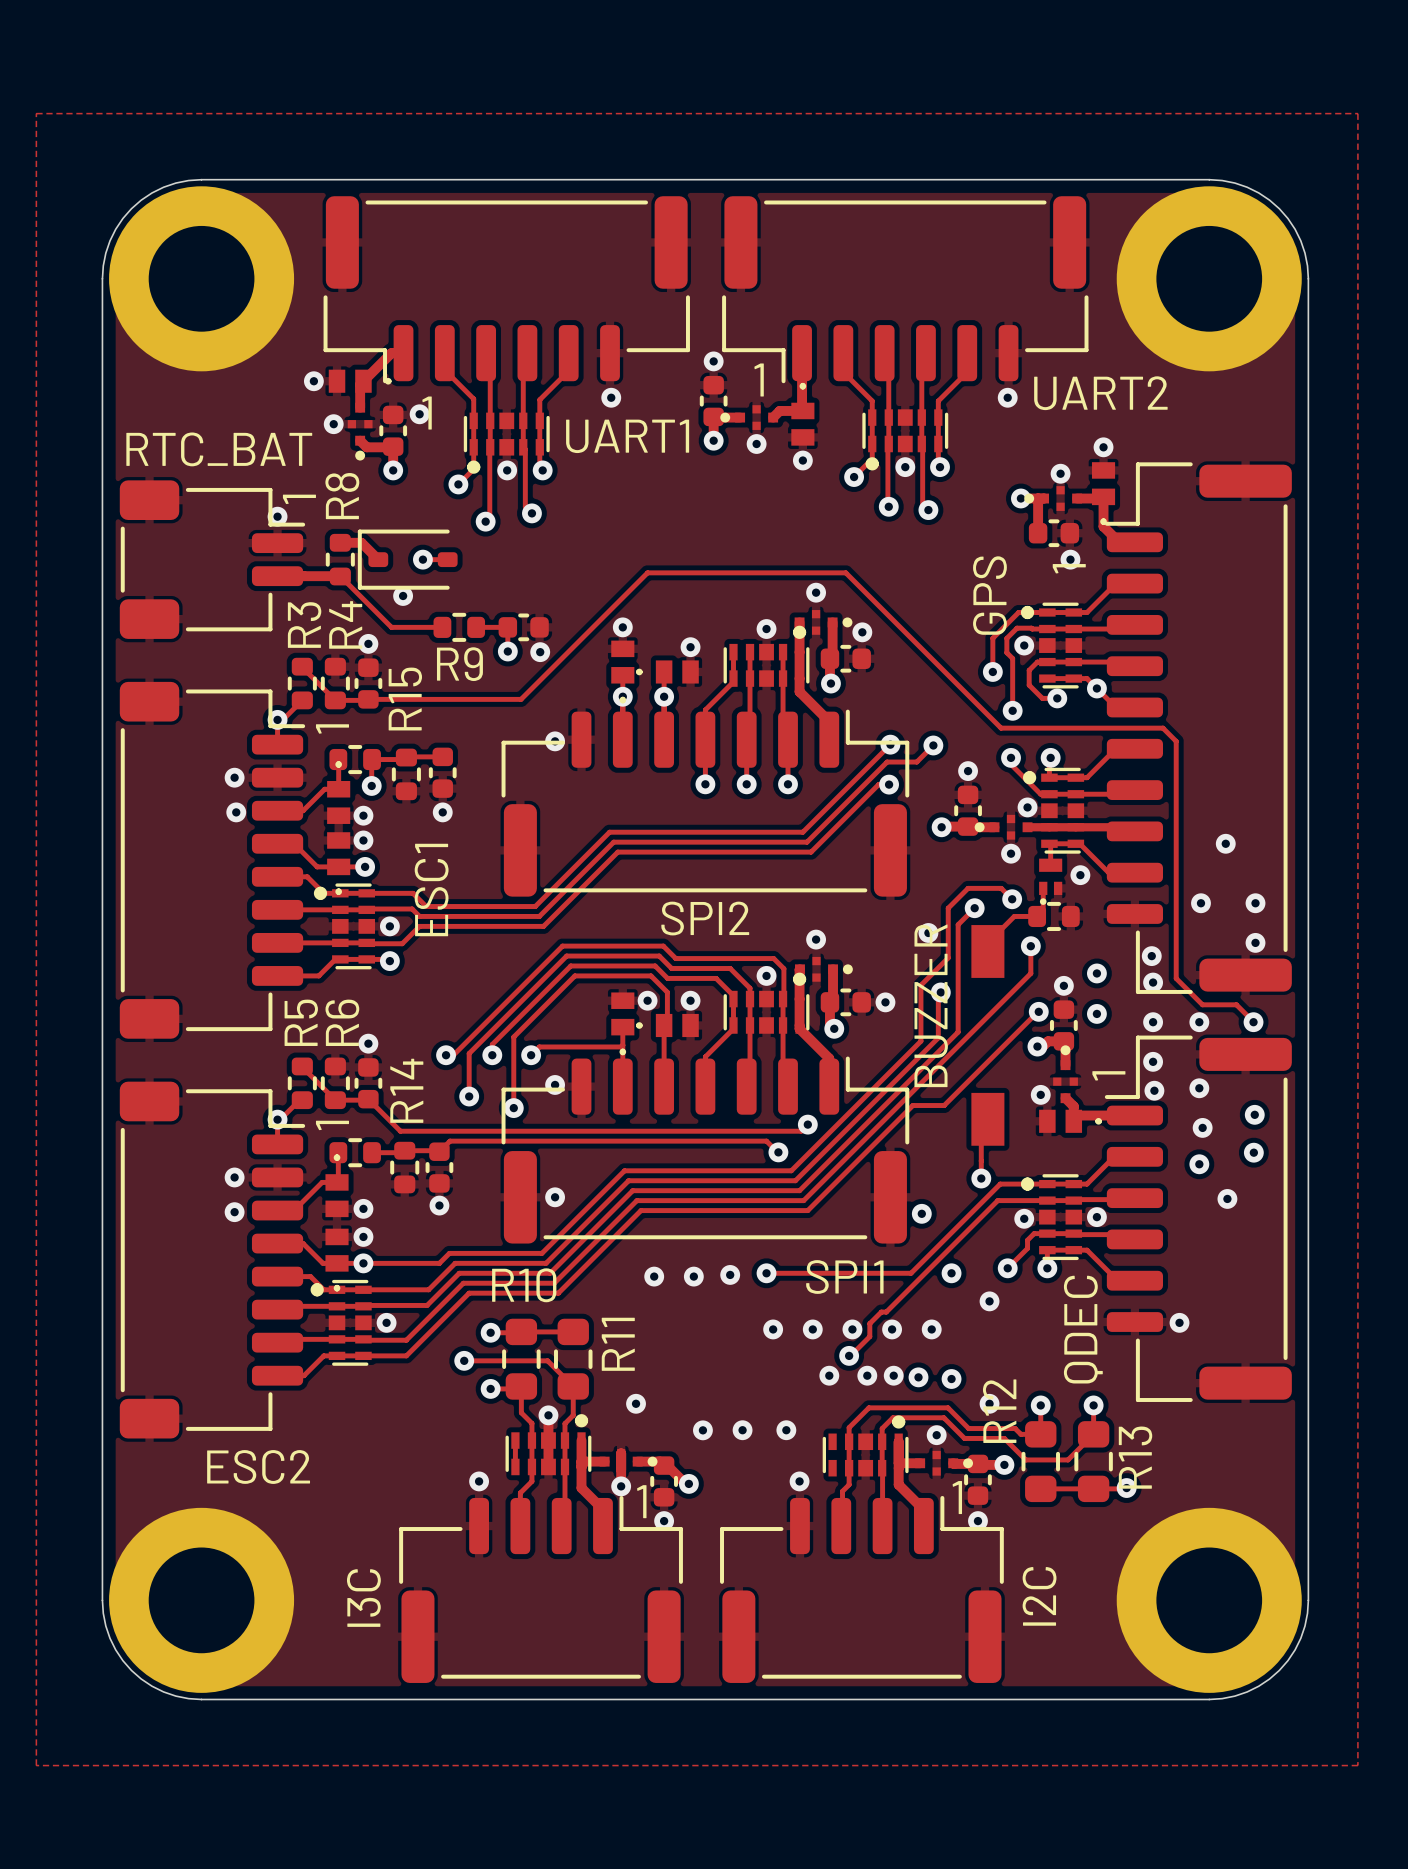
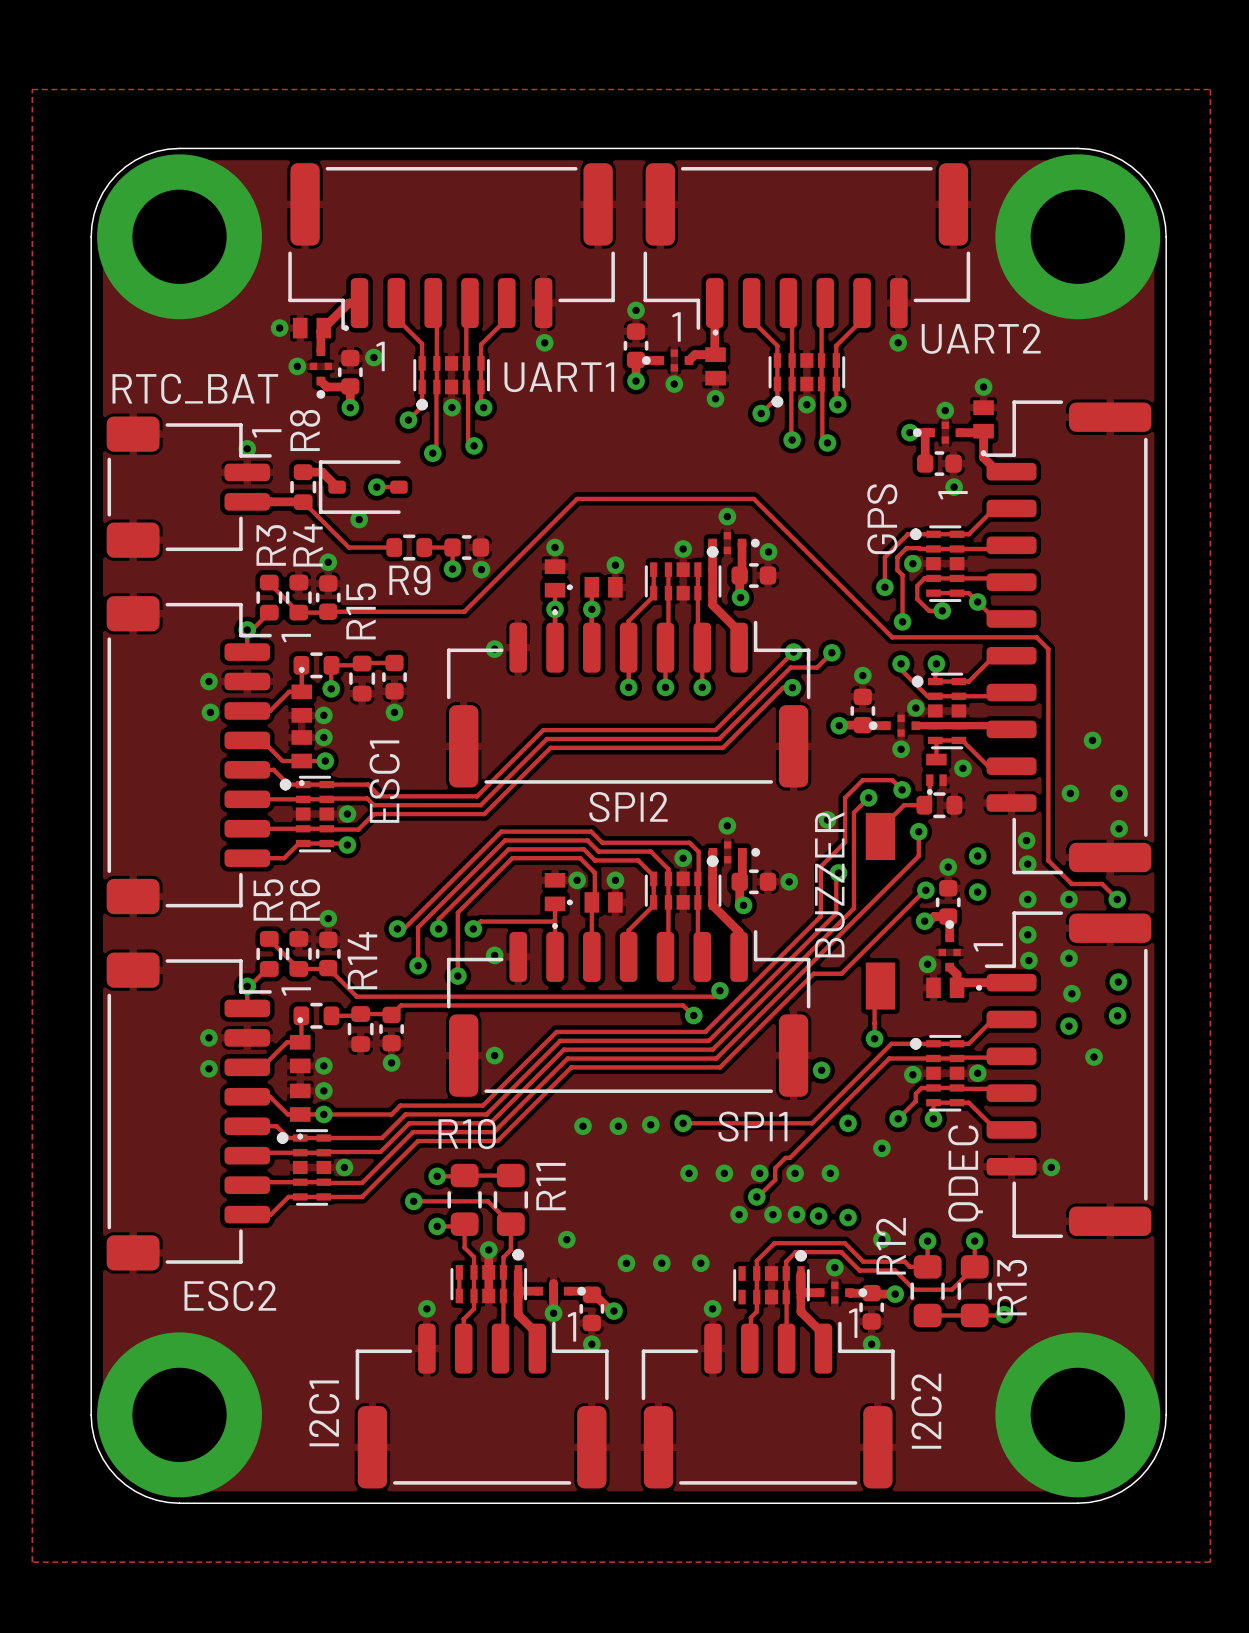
part value: I2C (1039, 1596) -> I2C2 (926, 1411)
part value: I3C (363, 1598) -> I2C1 (324, 1413)

